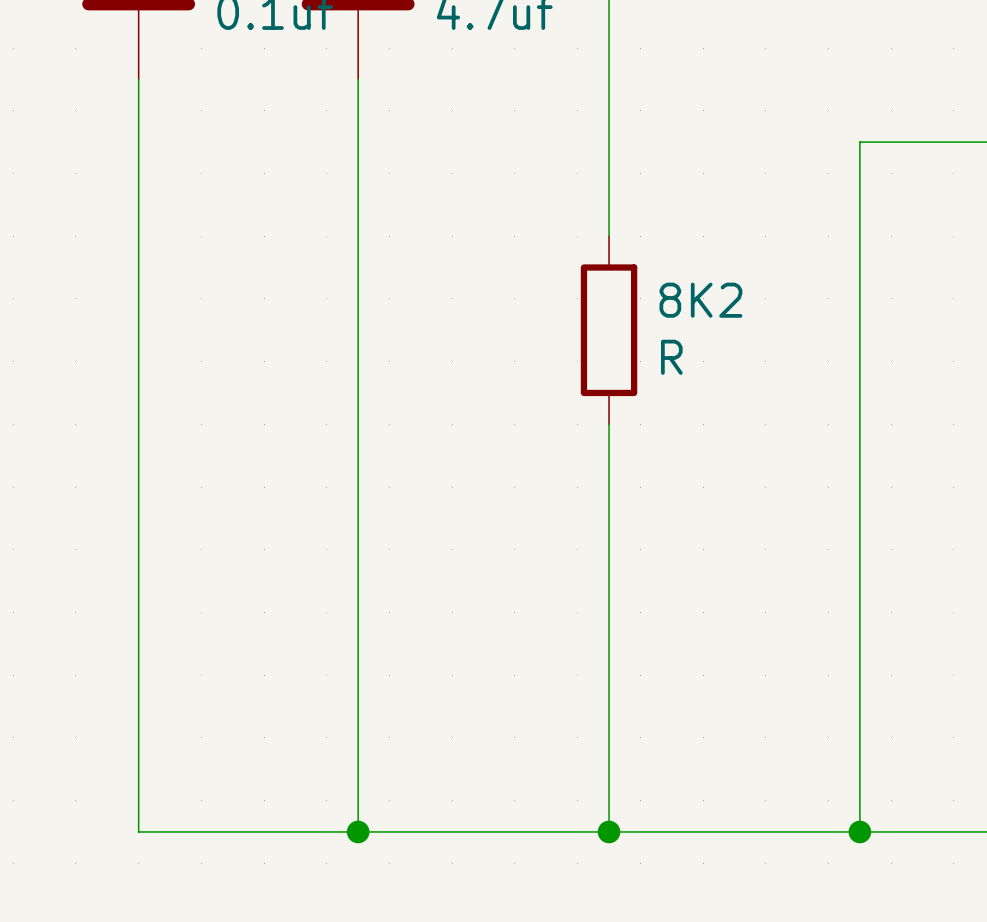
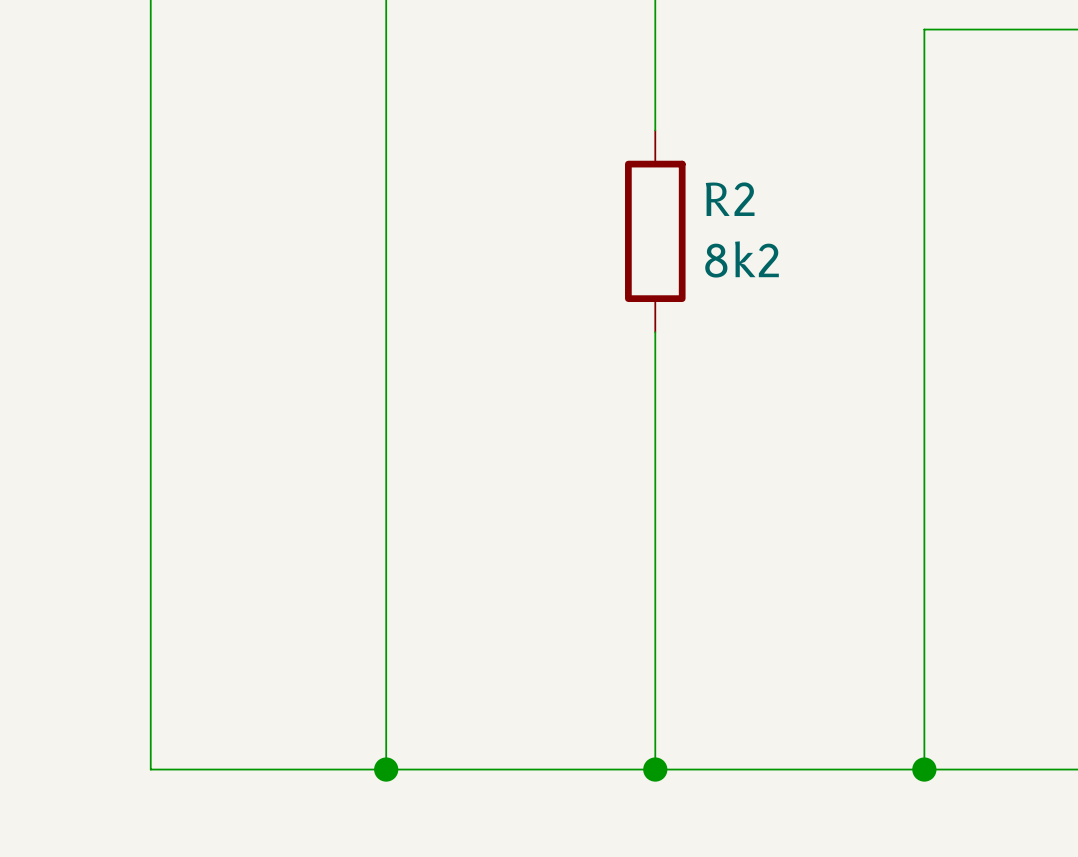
8K2 name: 8K2 (700, 300) -> R2 (730, 199)
8K2 value: R (671, 357) -> 8k2 (742, 259)

